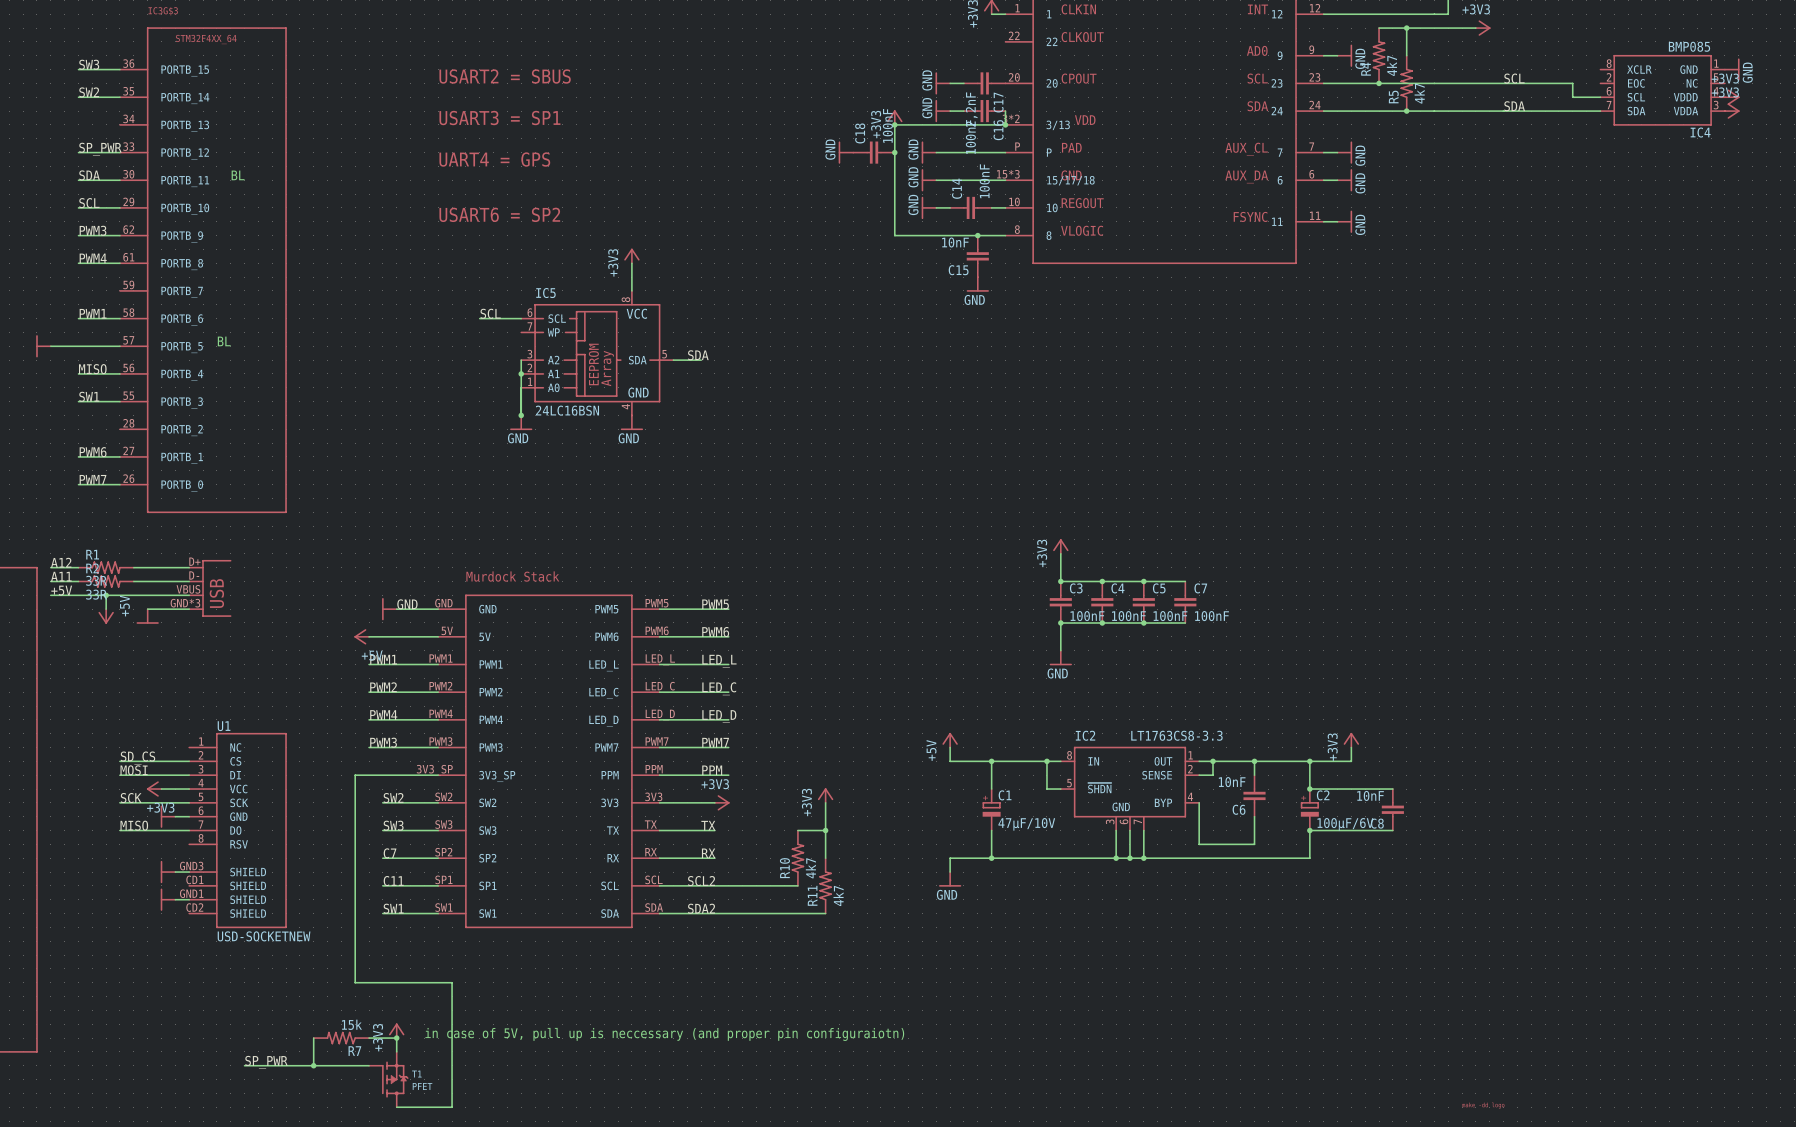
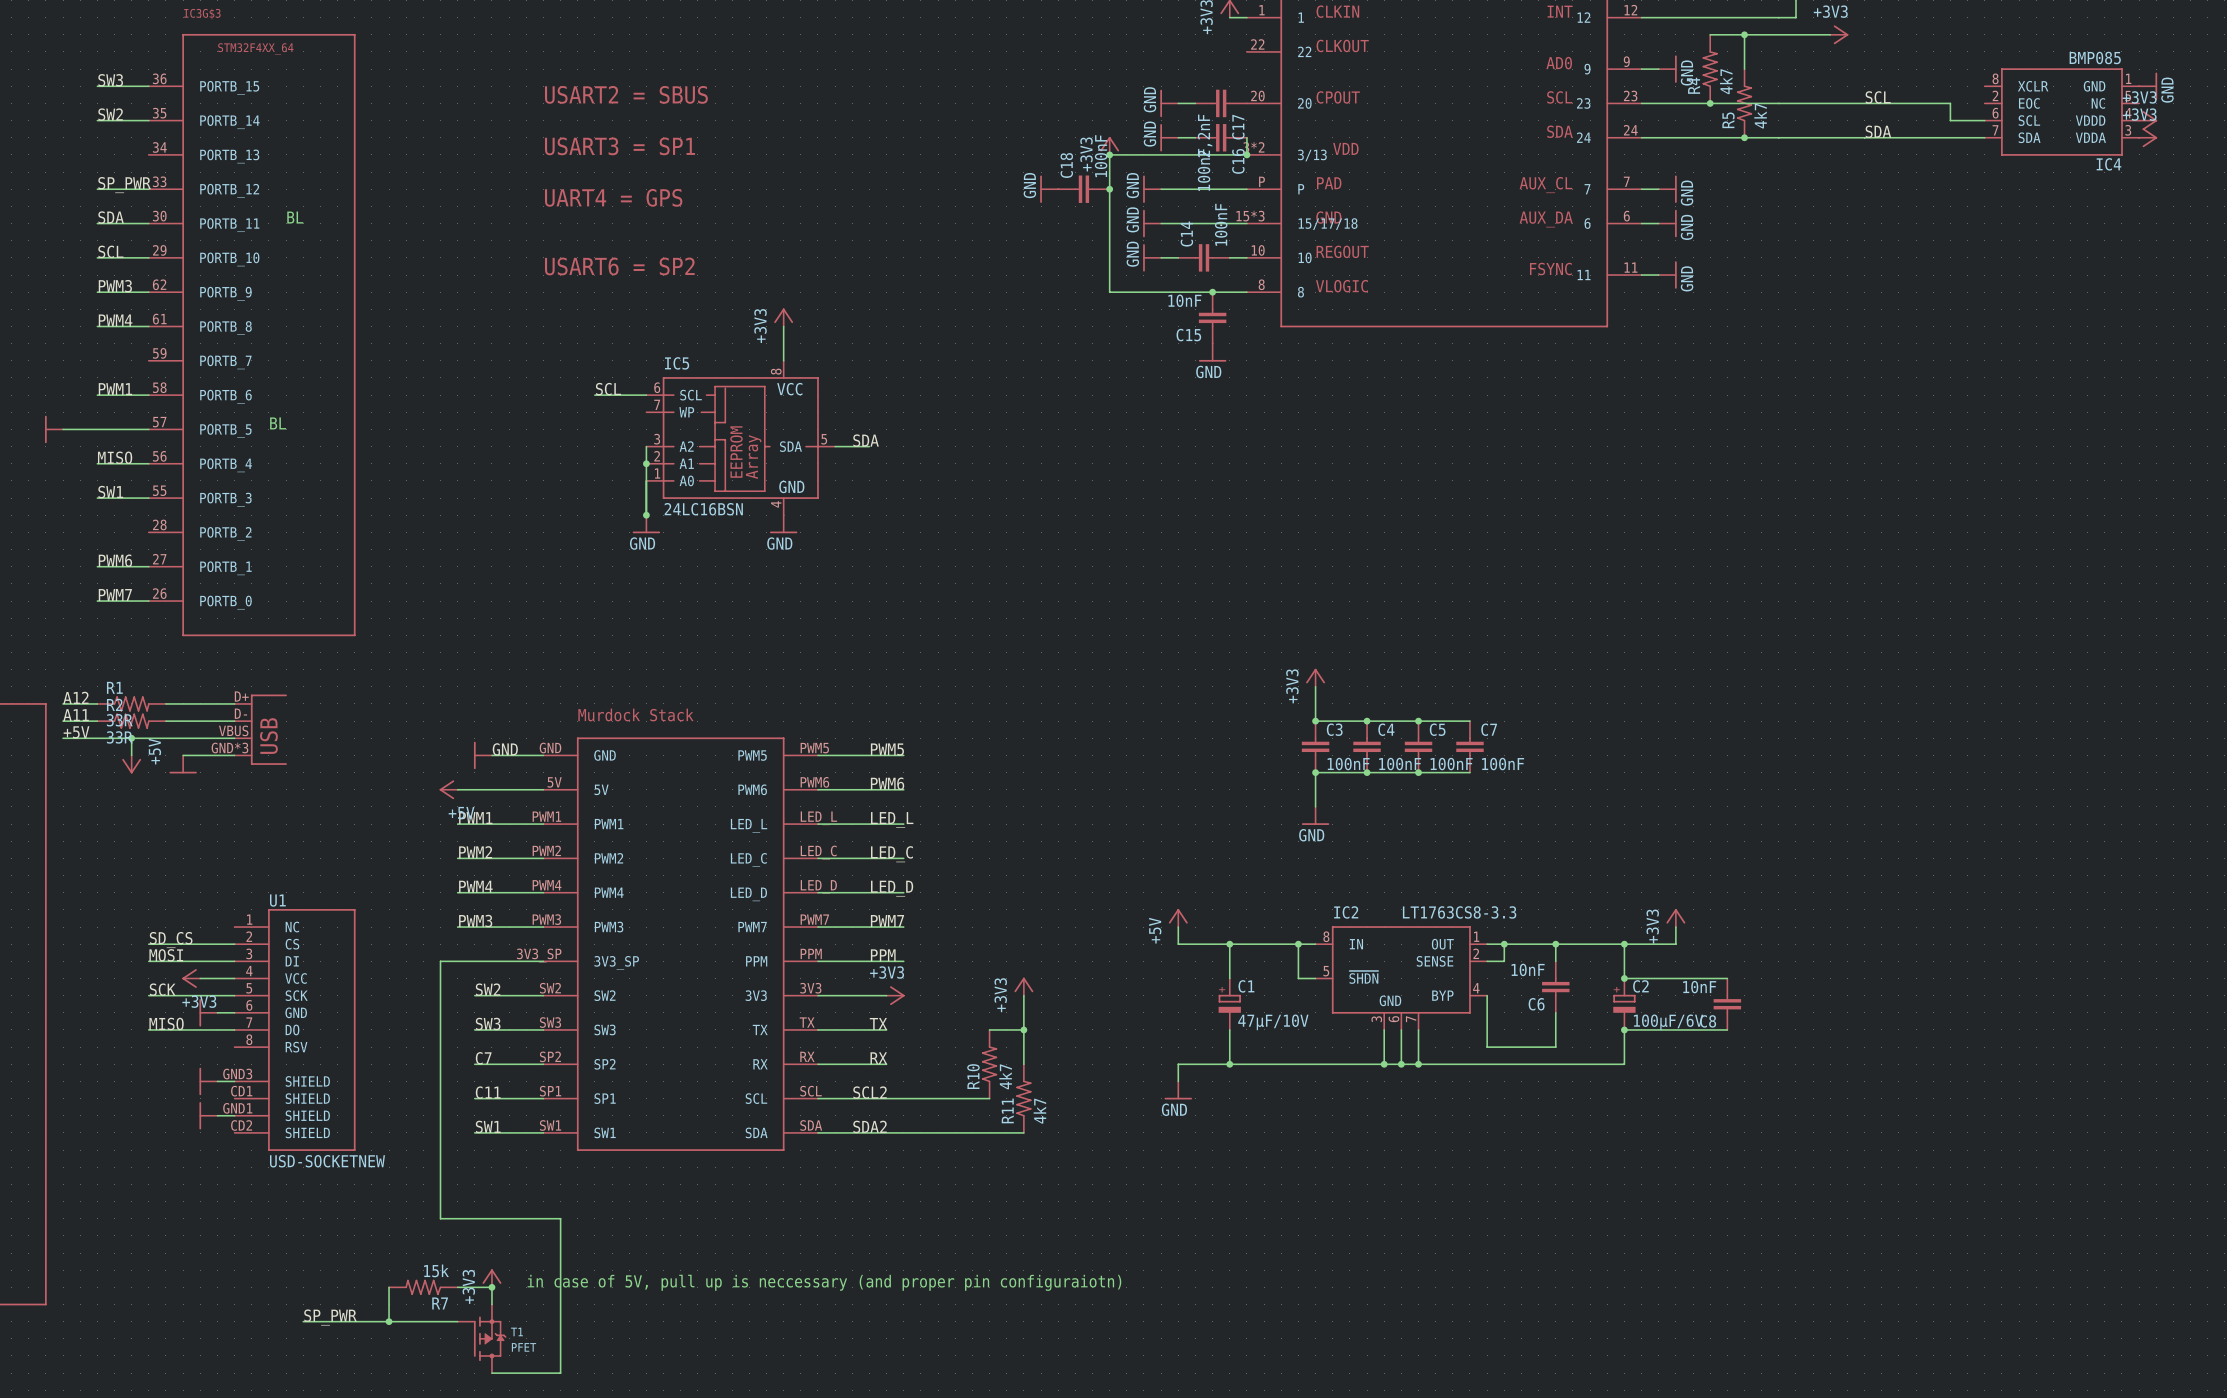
part: (1483, 1105) -> none

